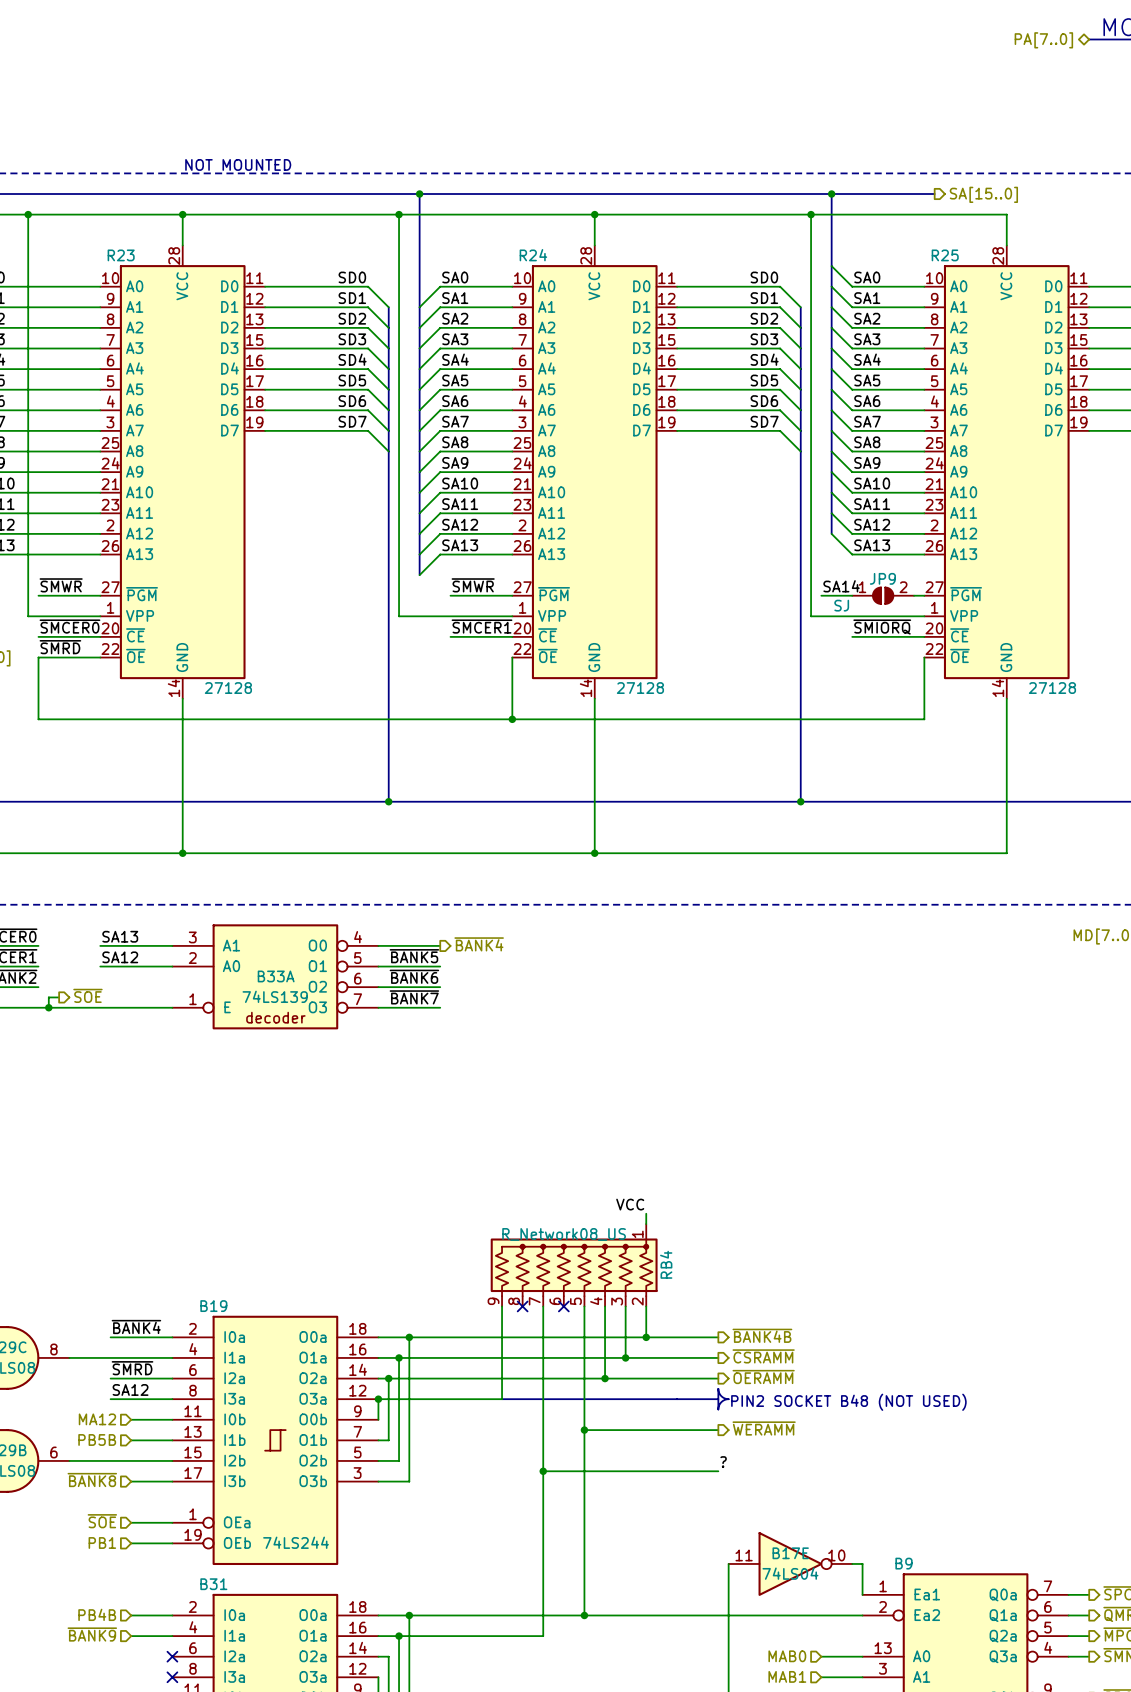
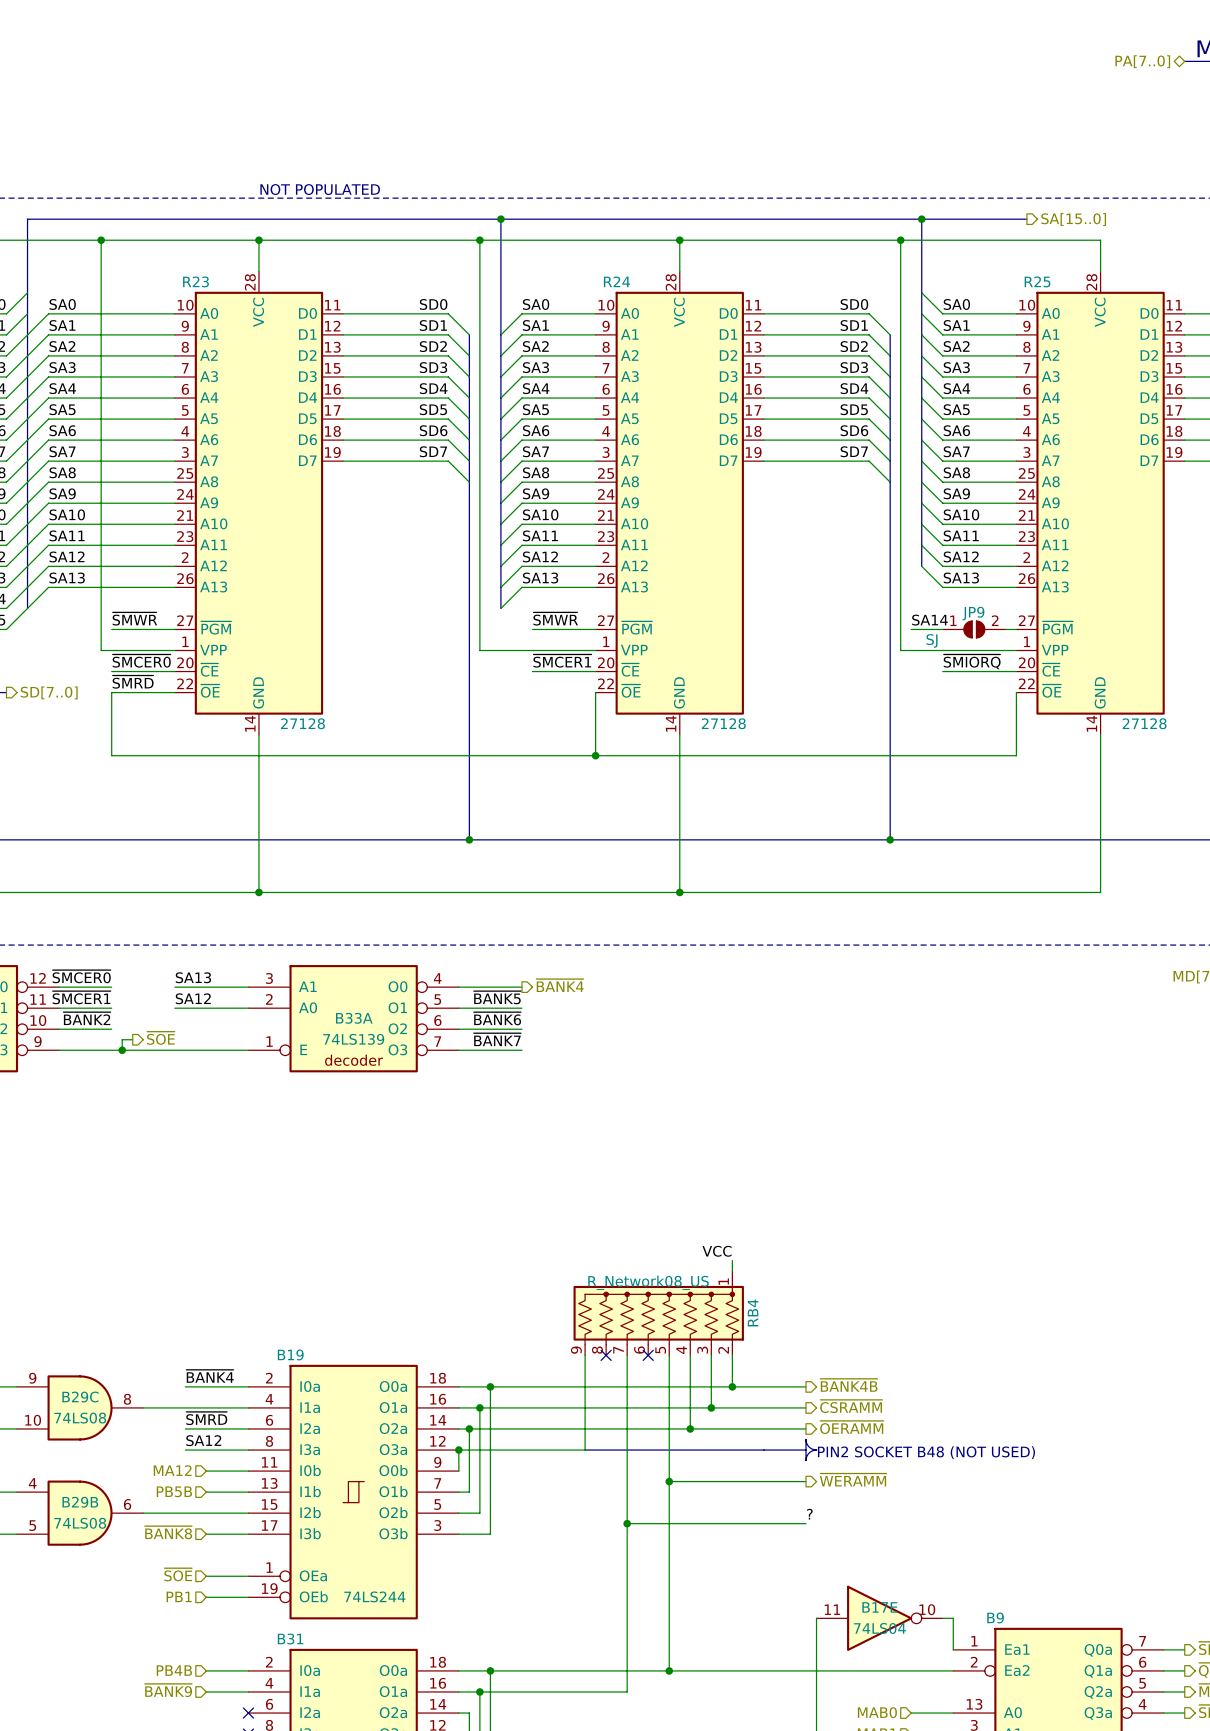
text: NOT MOUNTED (238, 164) -> NOT POPULATED (320, 189)

